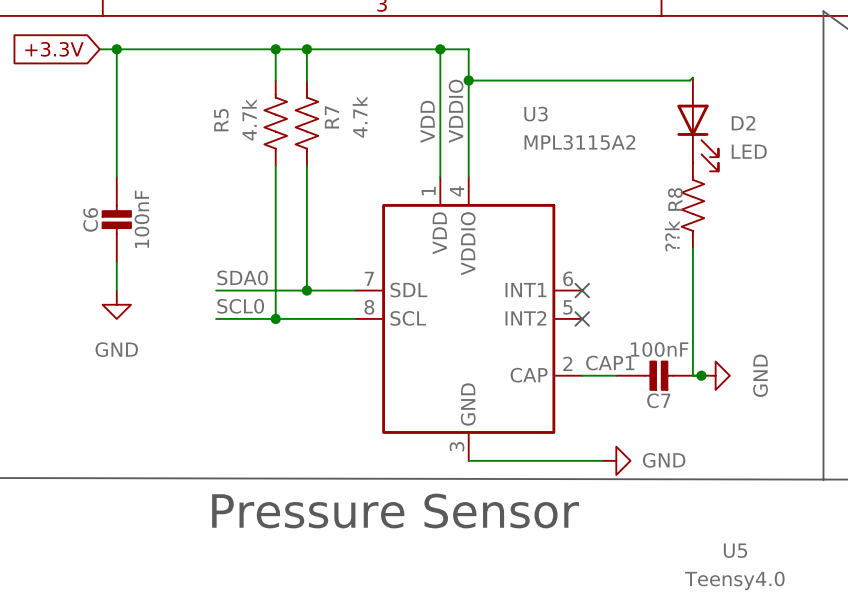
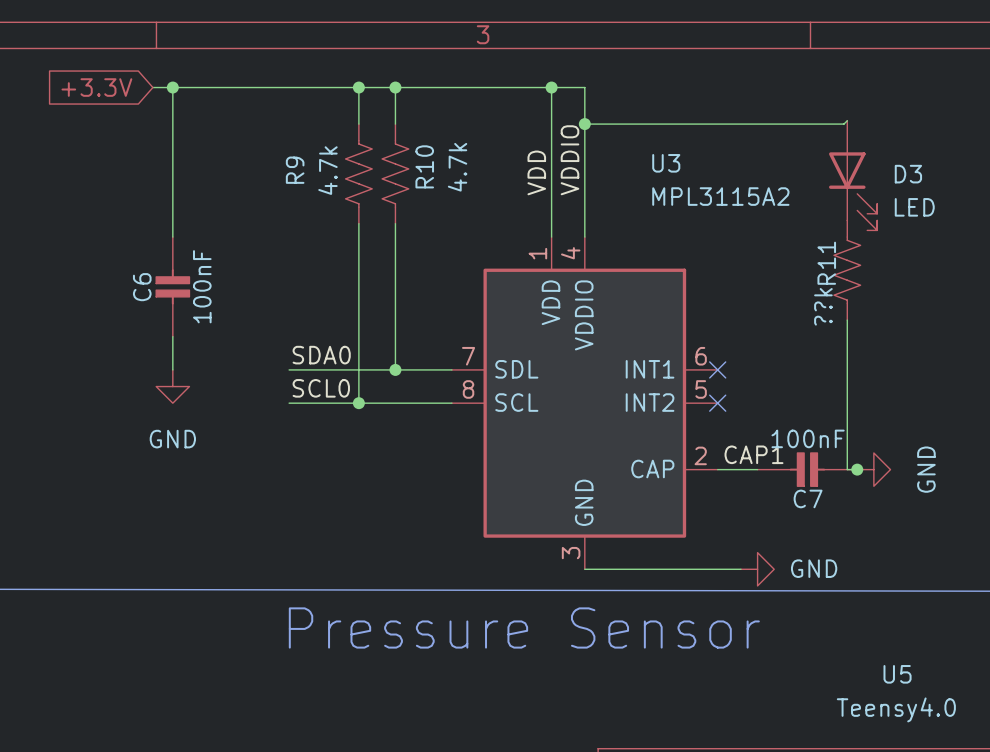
R7 name: R7 (331, 117) -> R10 (424, 166)
R5 name: R5 (221, 120) -> R9 (295, 170)
D2 name: D2 (743, 123) -> D3 (908, 174)
R8 name: R8 (675, 199) -> R11 (826, 263)

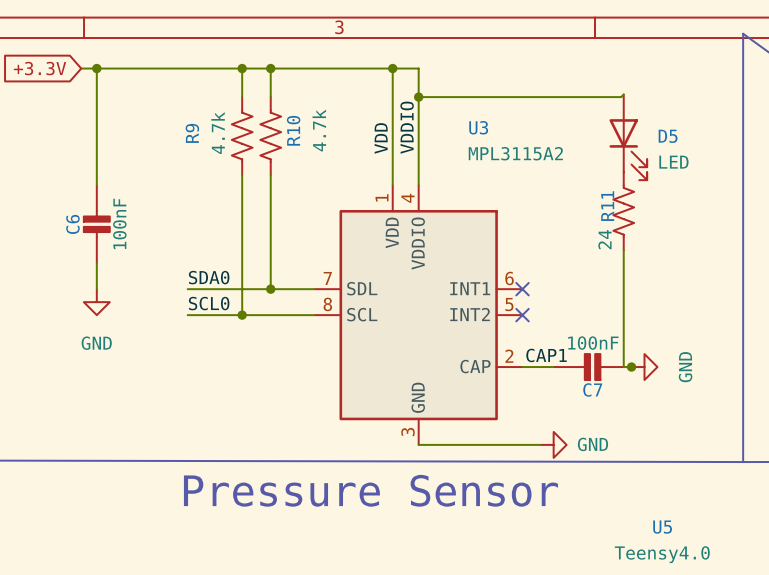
D3 name: D3 (908, 174) -> D5 (668, 136)
R11 value: ??k (823, 306) -> 24 (604, 239)

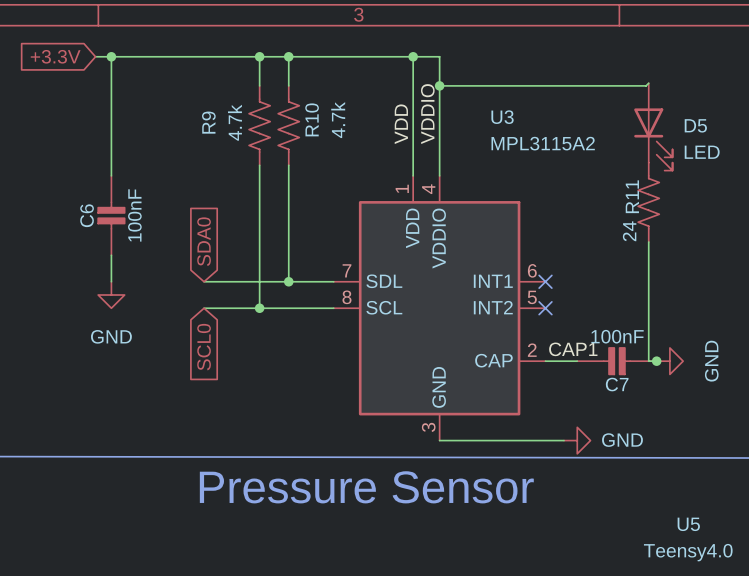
global label: none -> SDA0 (204, 241)
label: SDA0 (209, 277) -> none
label: SCL0 (209, 303) -> none
global label: none -> SCL0 (204, 347)

